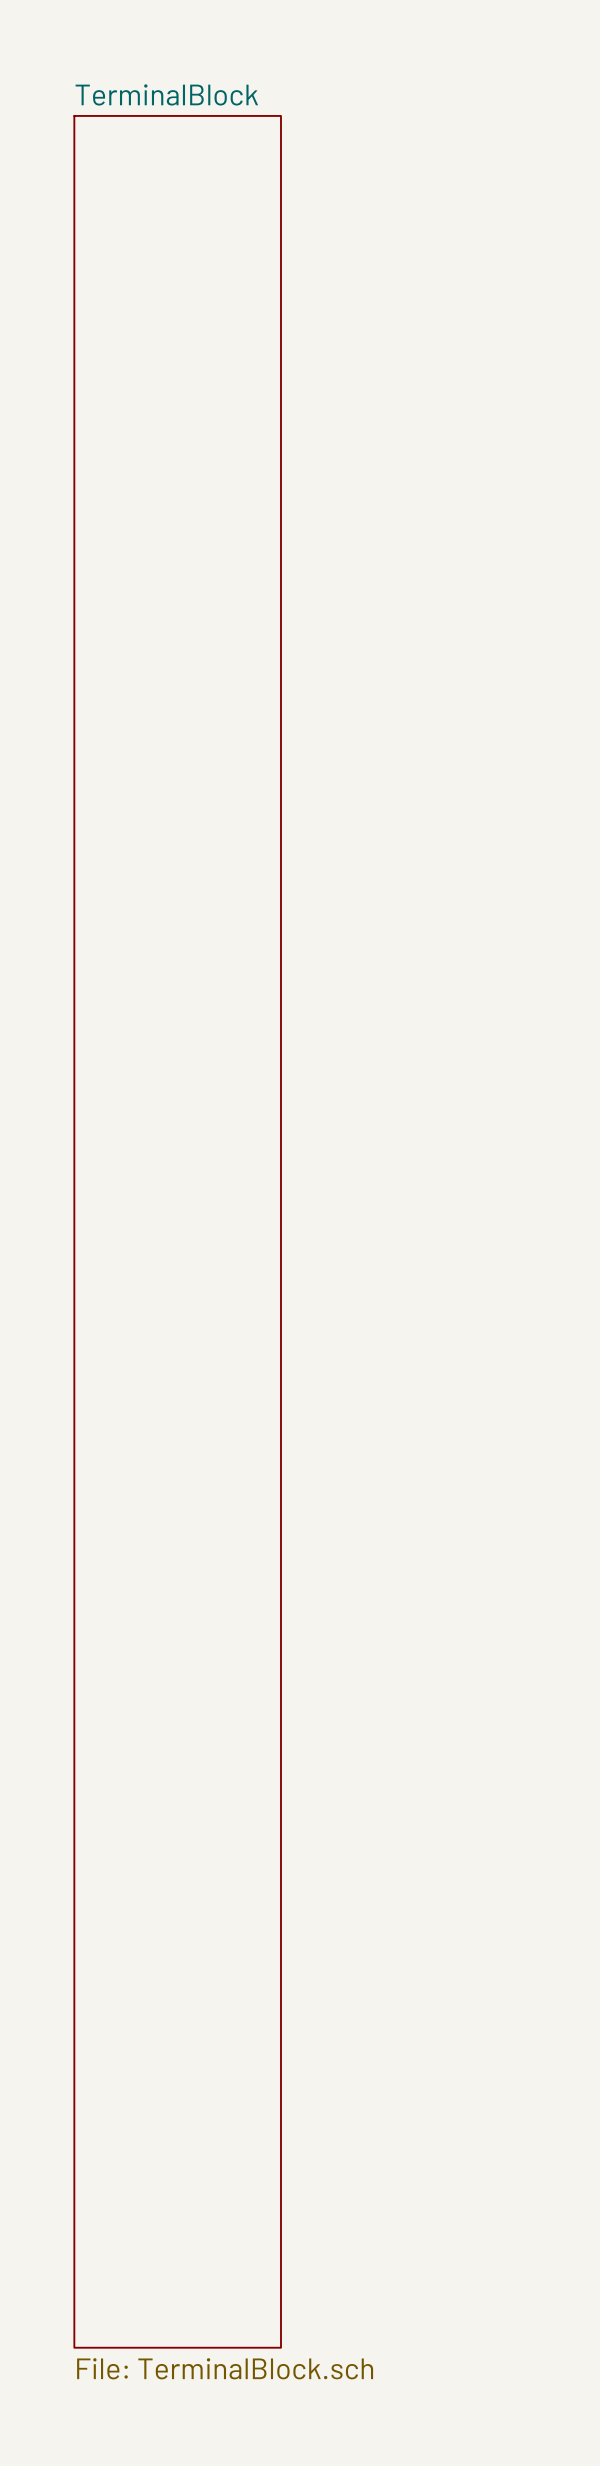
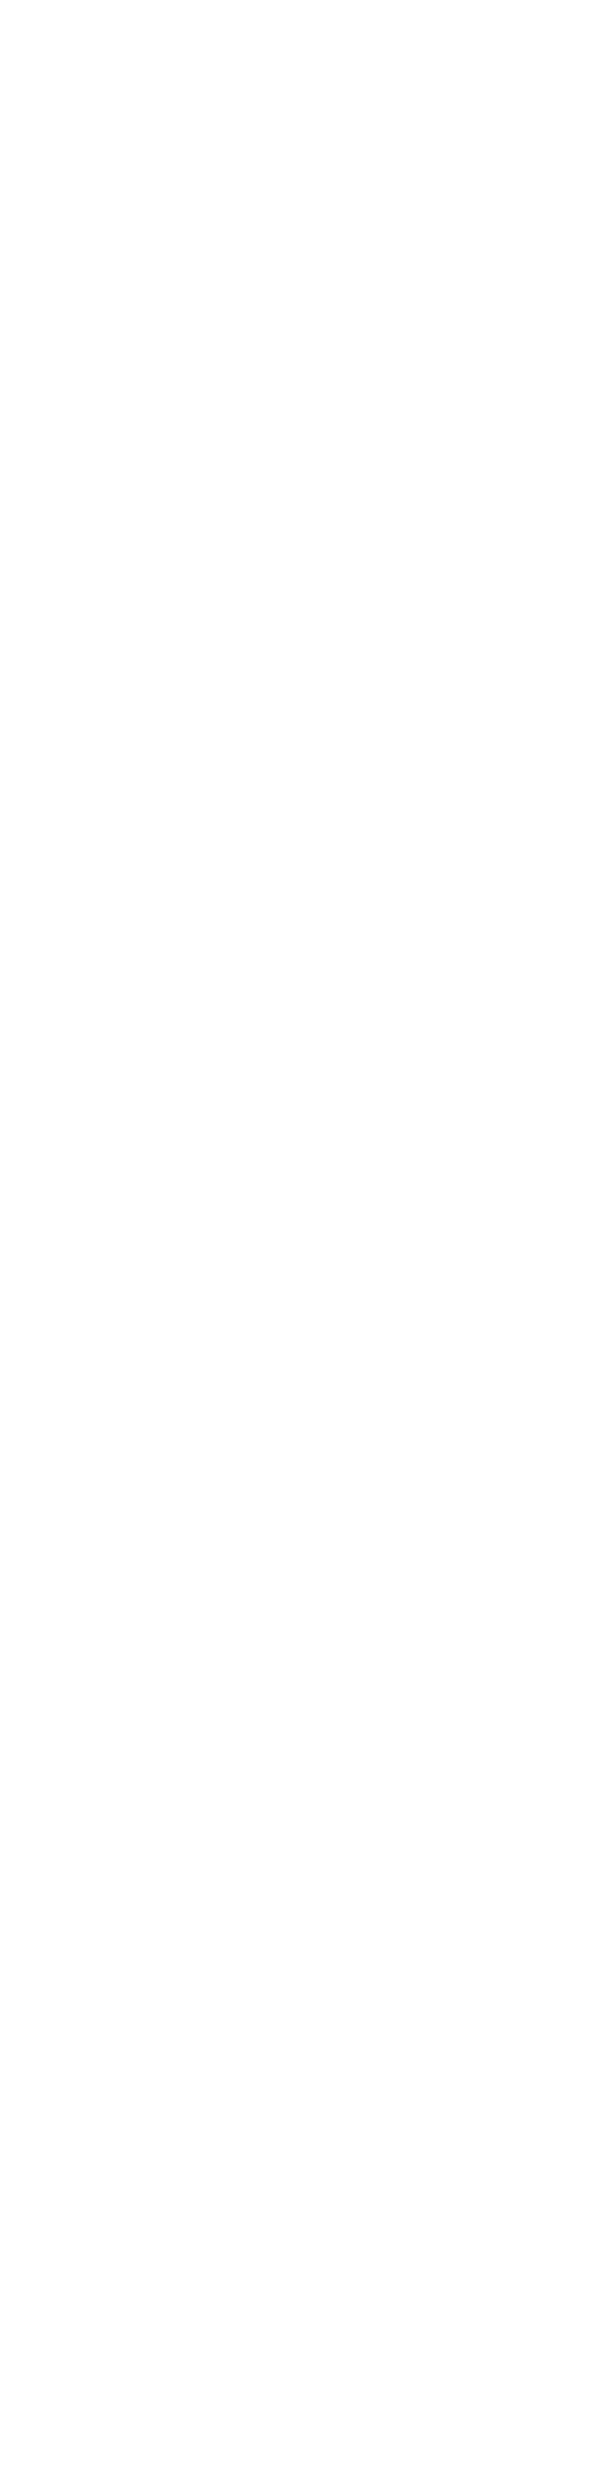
sheet TerminalBlock: File: TerminalBlock.sch (177, 1231) -> none

